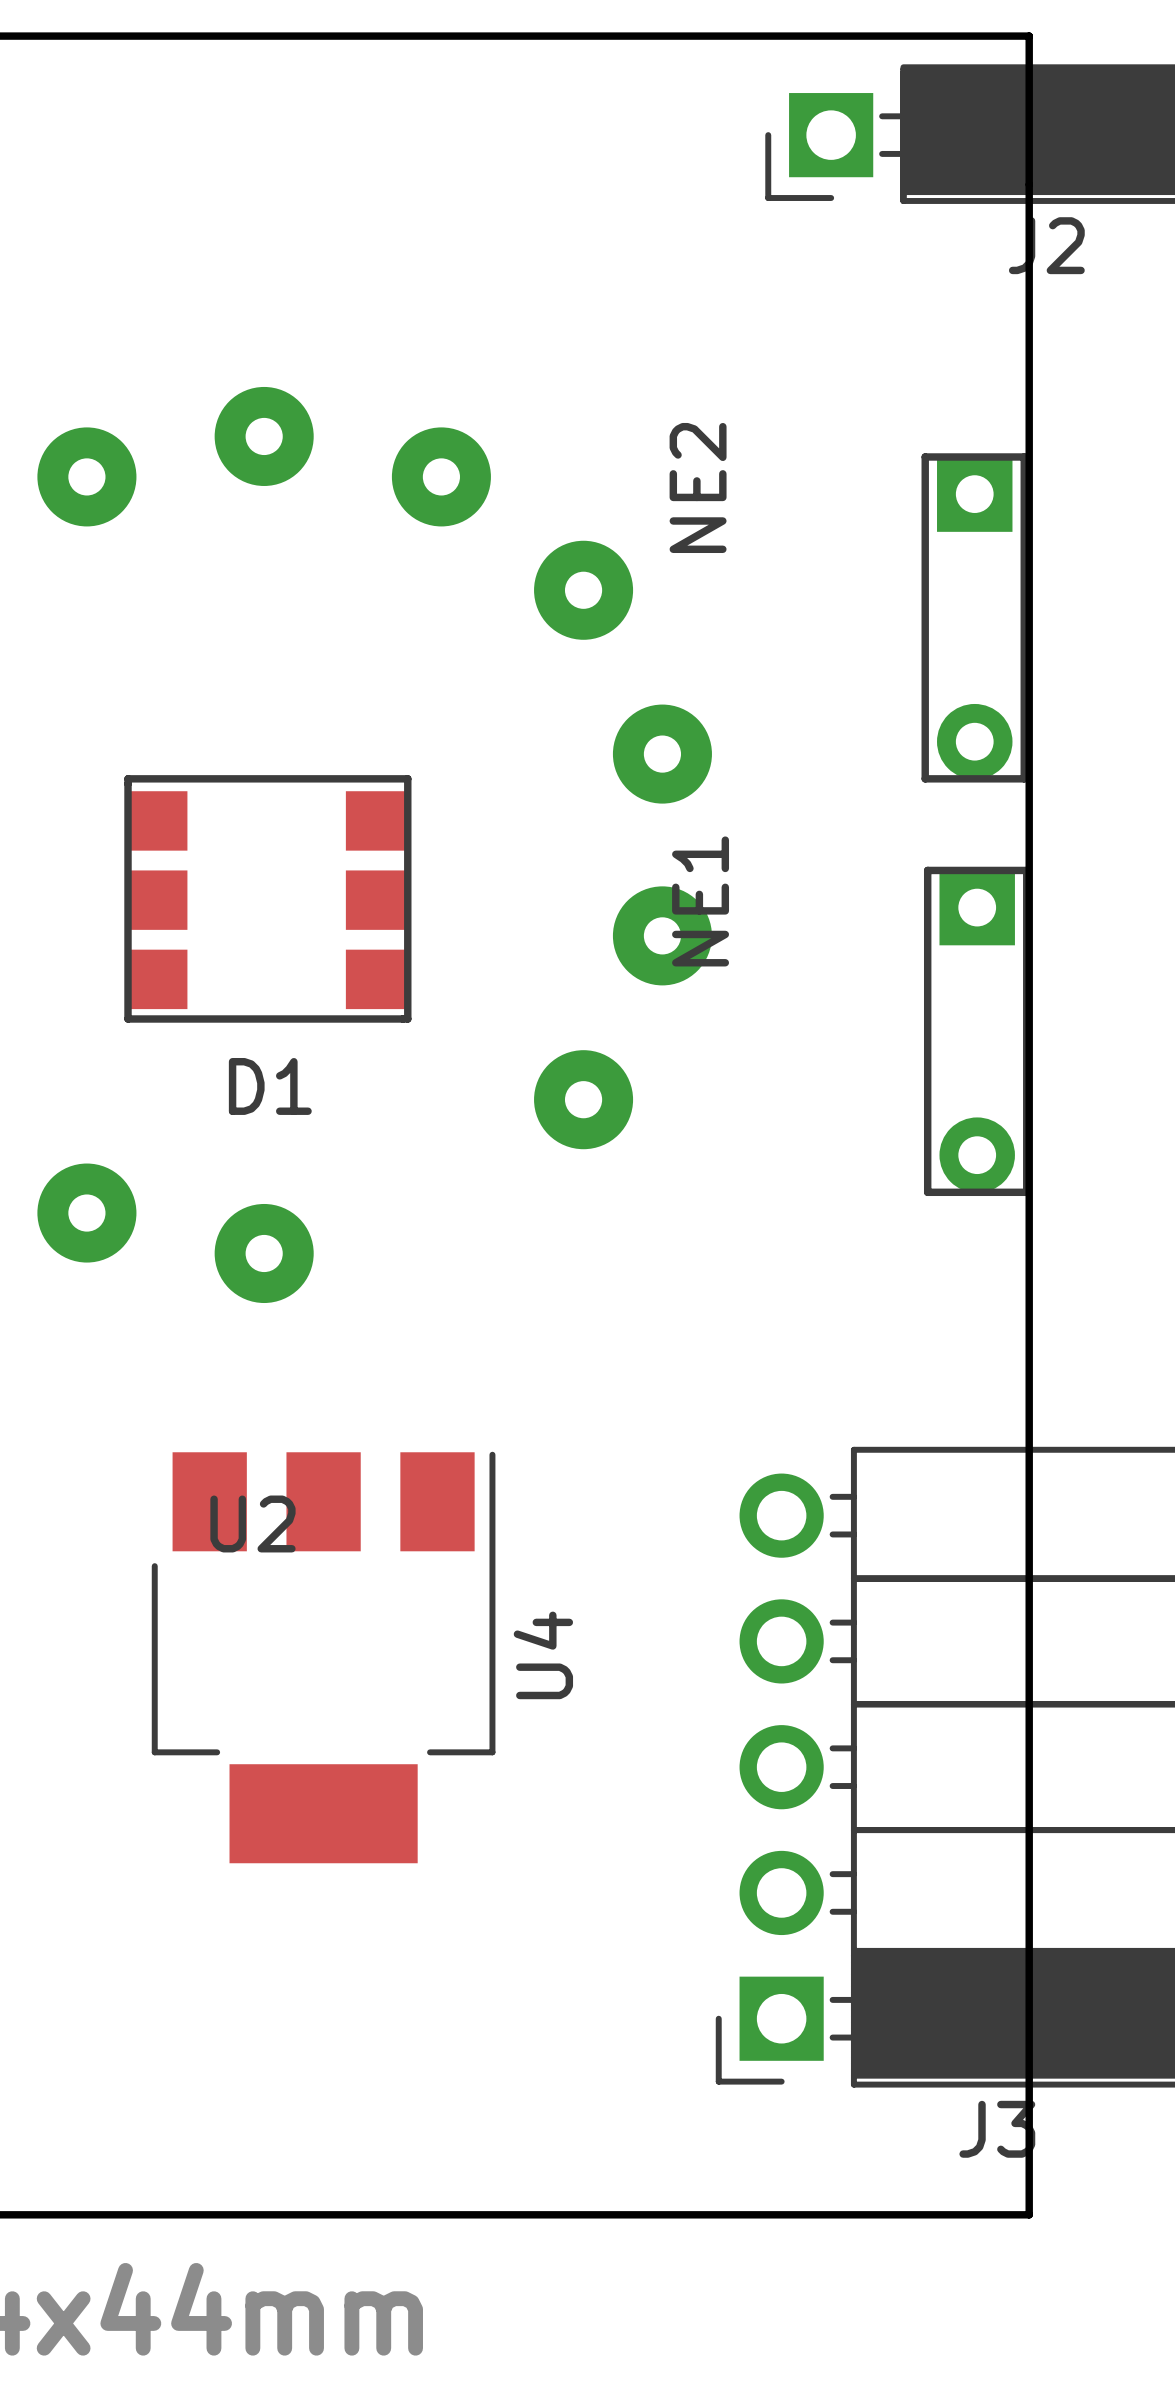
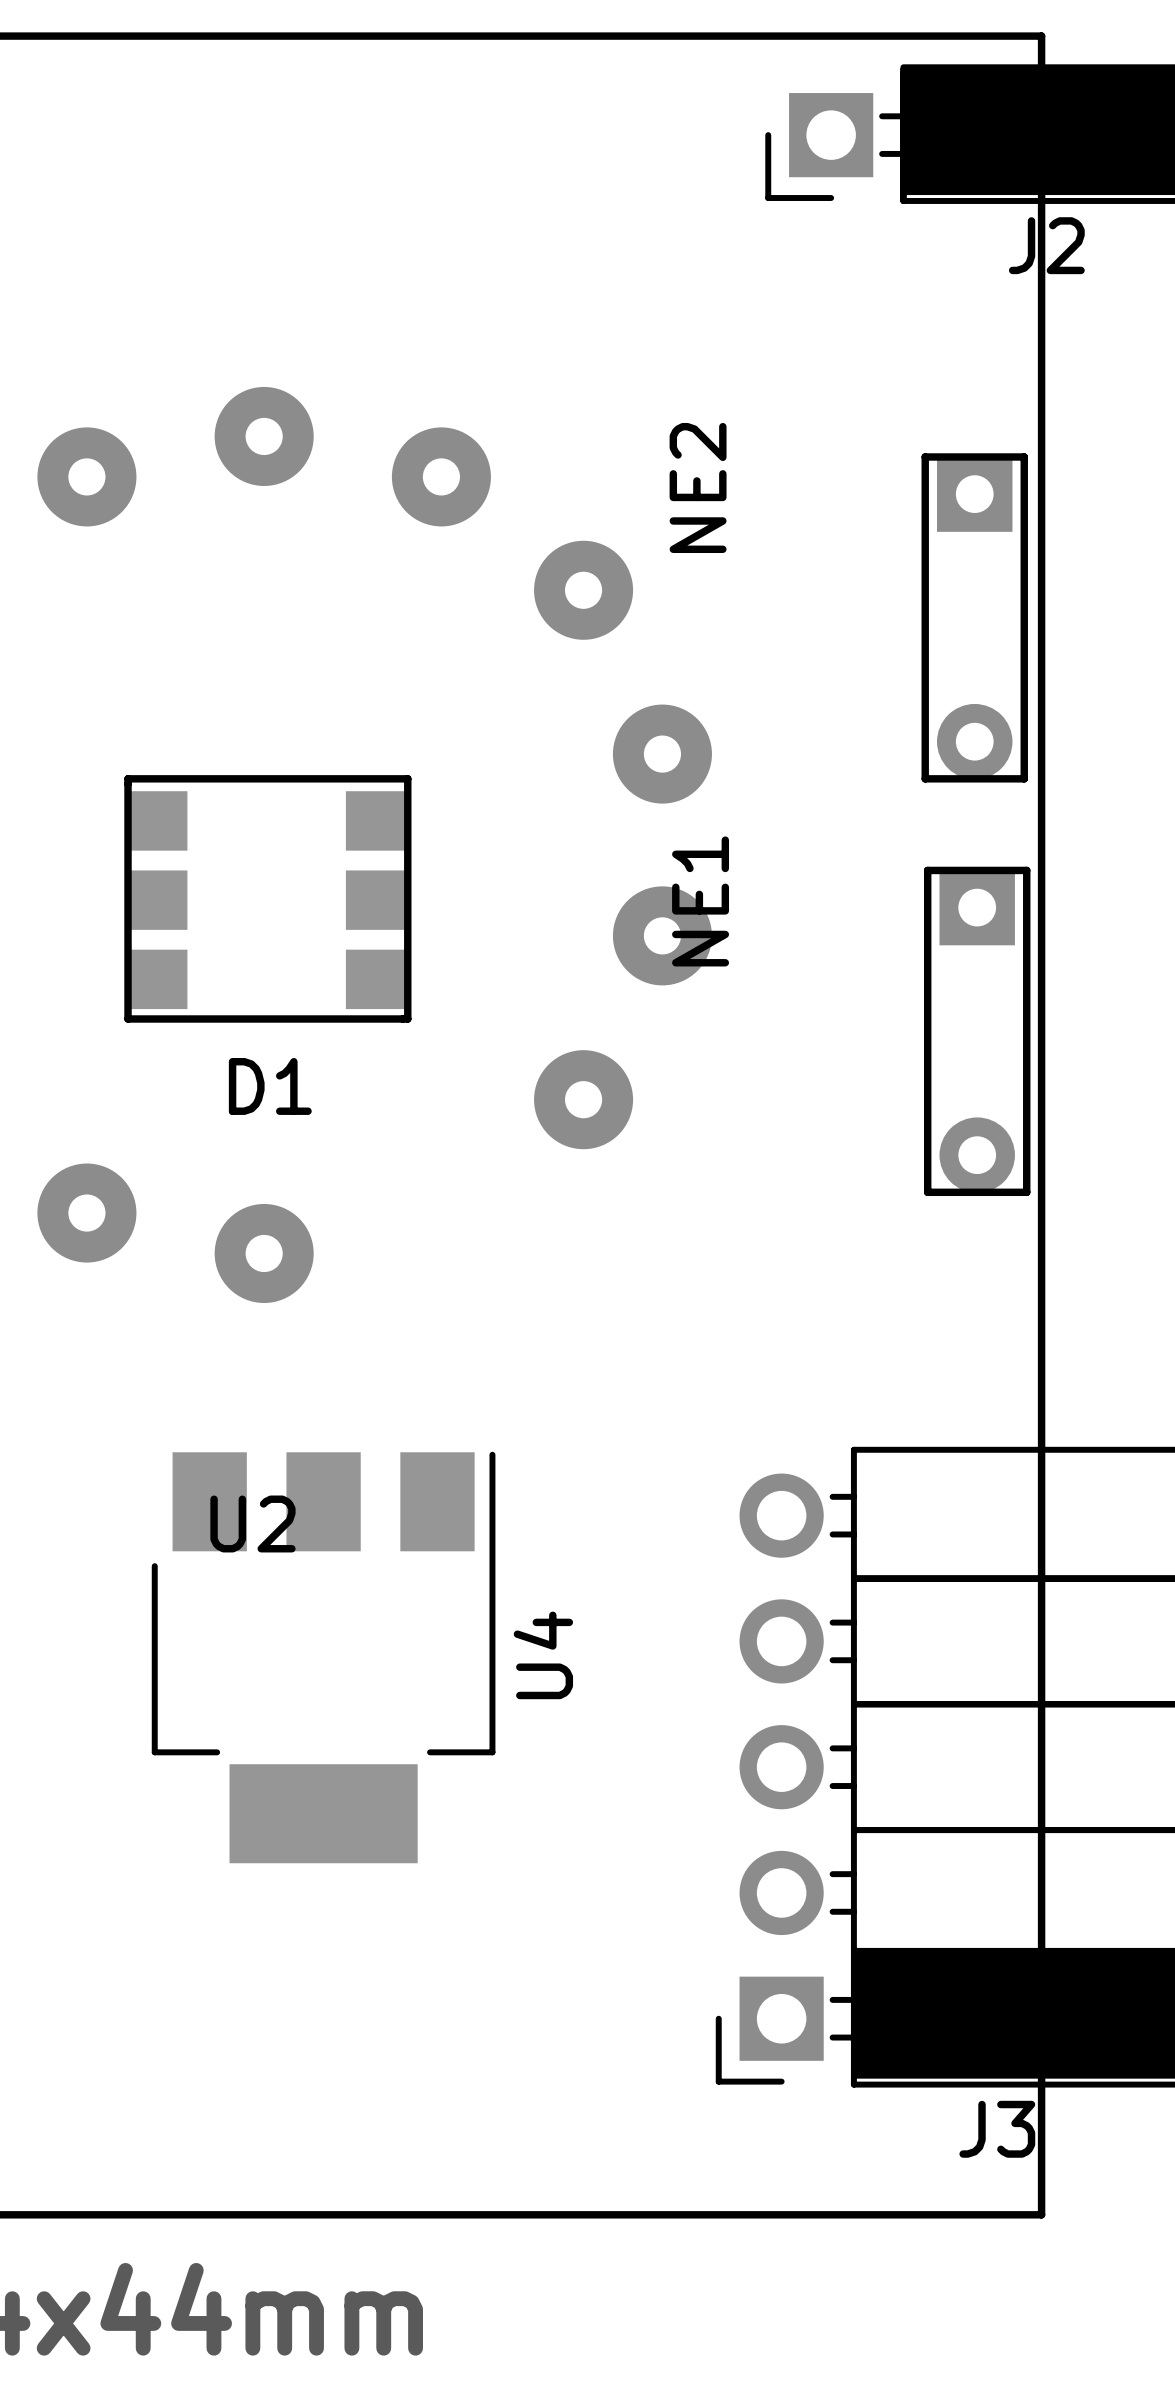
board edge: (1029, 36) (1029, 2214) -> (1029, 36) (1041, 36) (1041, 2214) (1029, 2214)

